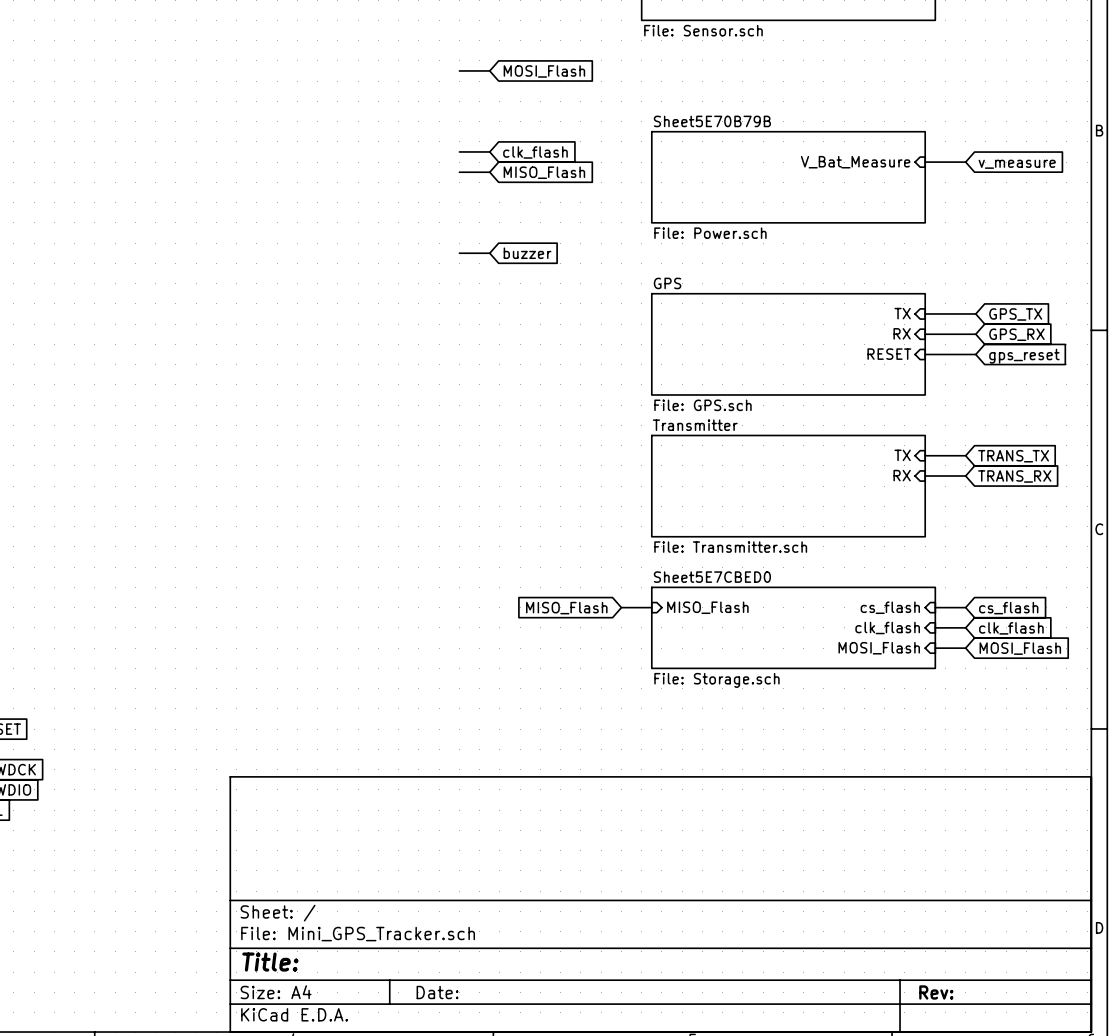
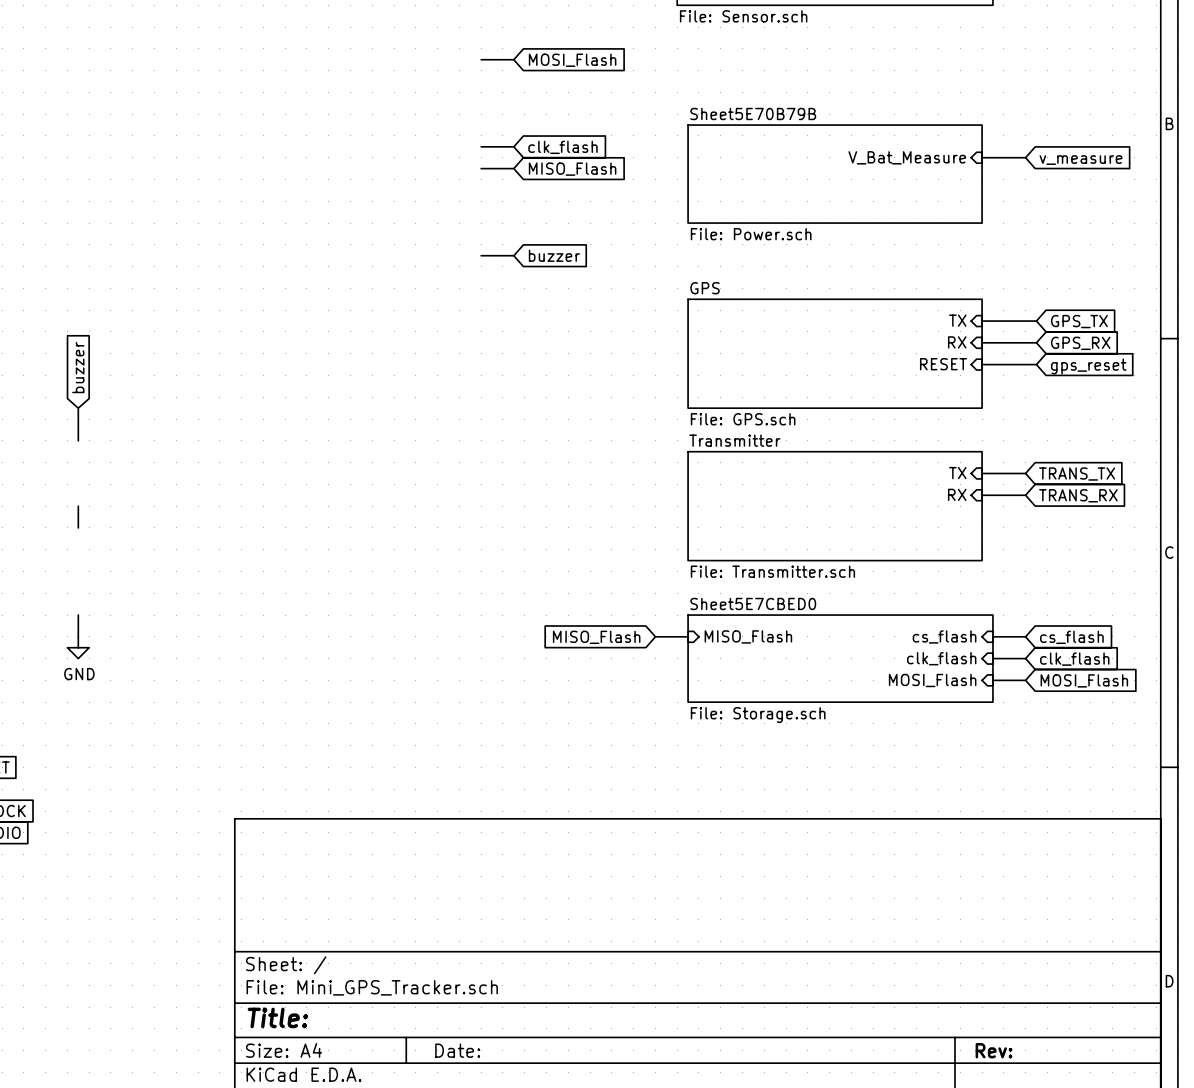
global label: none -> buzzer (78, 367)
wire: none -> (78, 408) (78, 440)
wire: none -> (78, 506) (78, 527)
wire: none -> (78, 615) (78, 636)
power symbol: none -> GND (78, 647)

